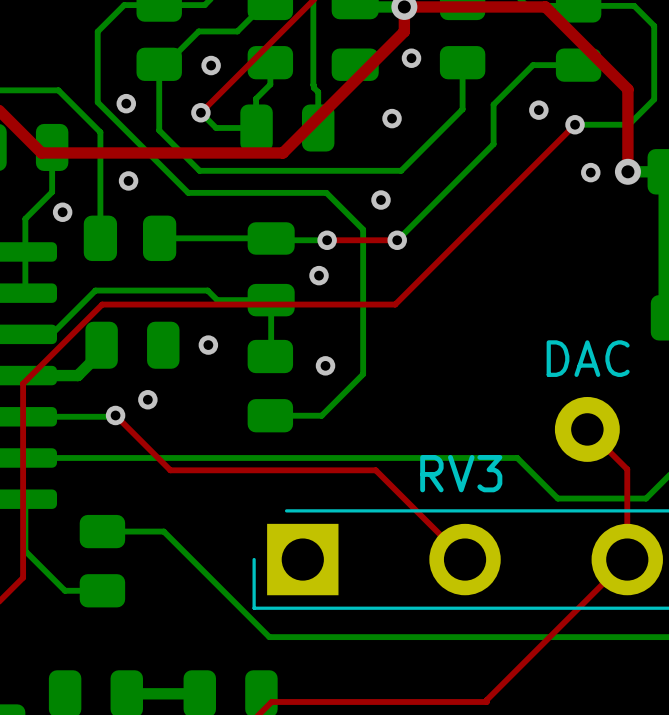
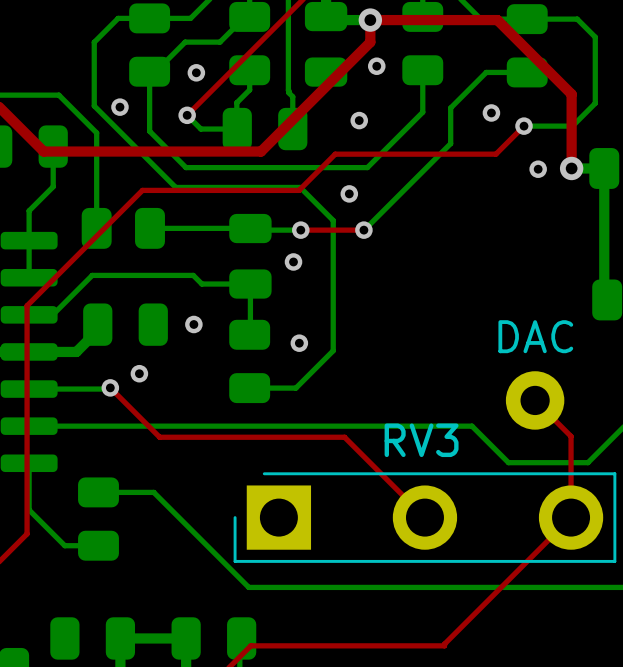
top track: (543, 155) (395, 304) (102, 304) (23, 383) -> (495, 154) (335, 154) (299, 190) (142, 190) (27, 305) (27, 359)
via: (128, 180) -> none
via: (62, 212) -> none

